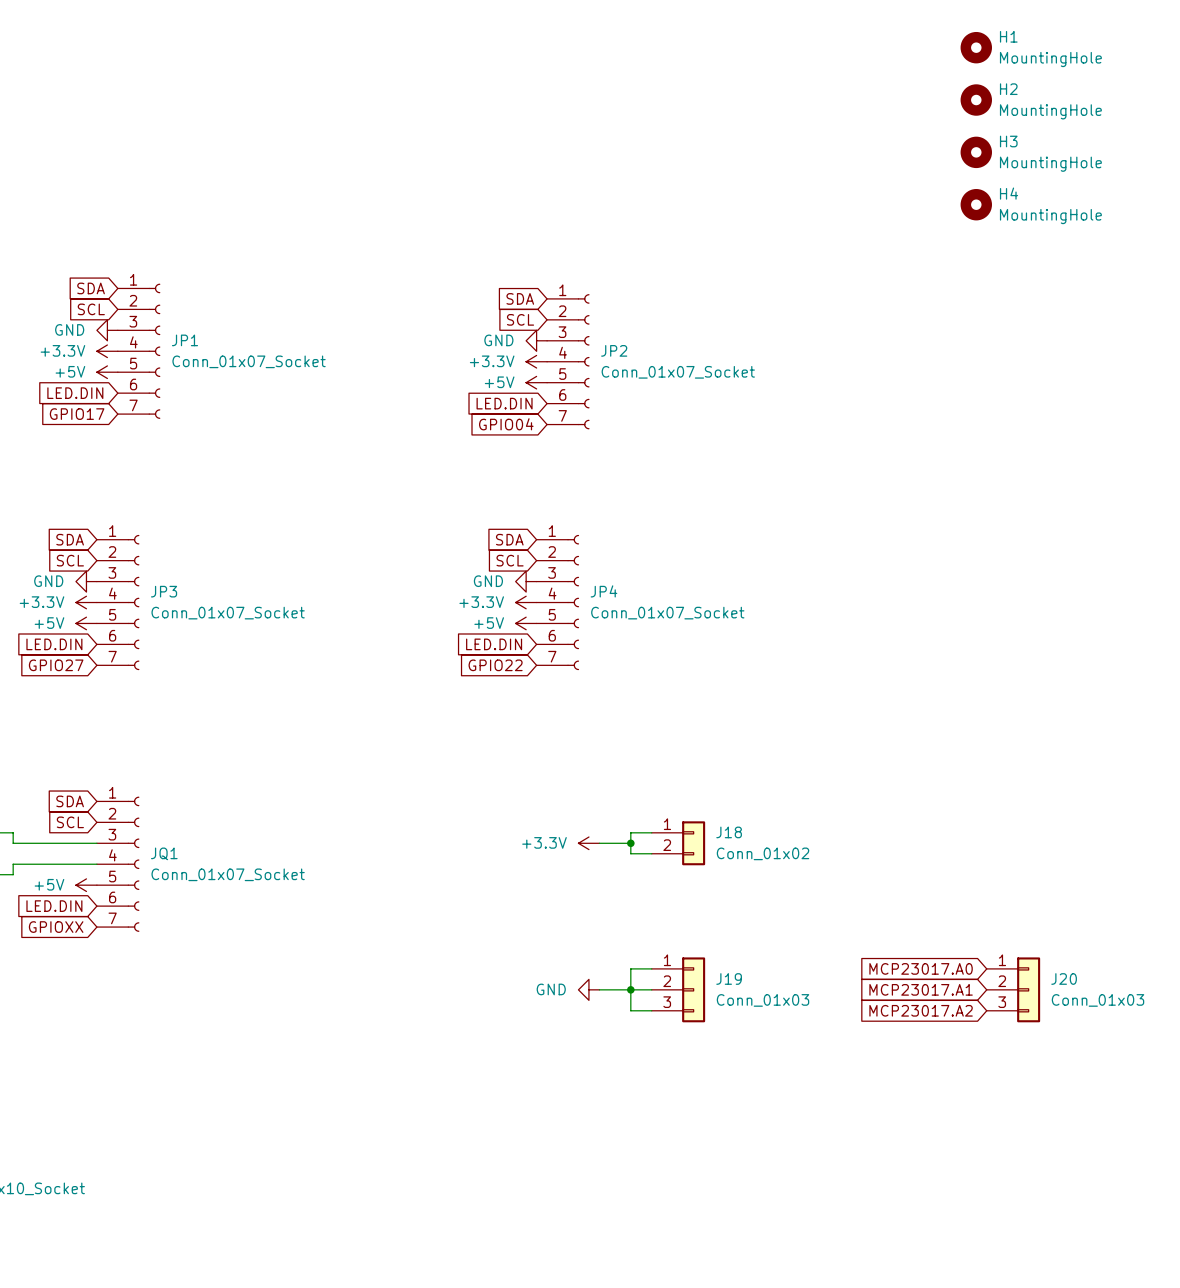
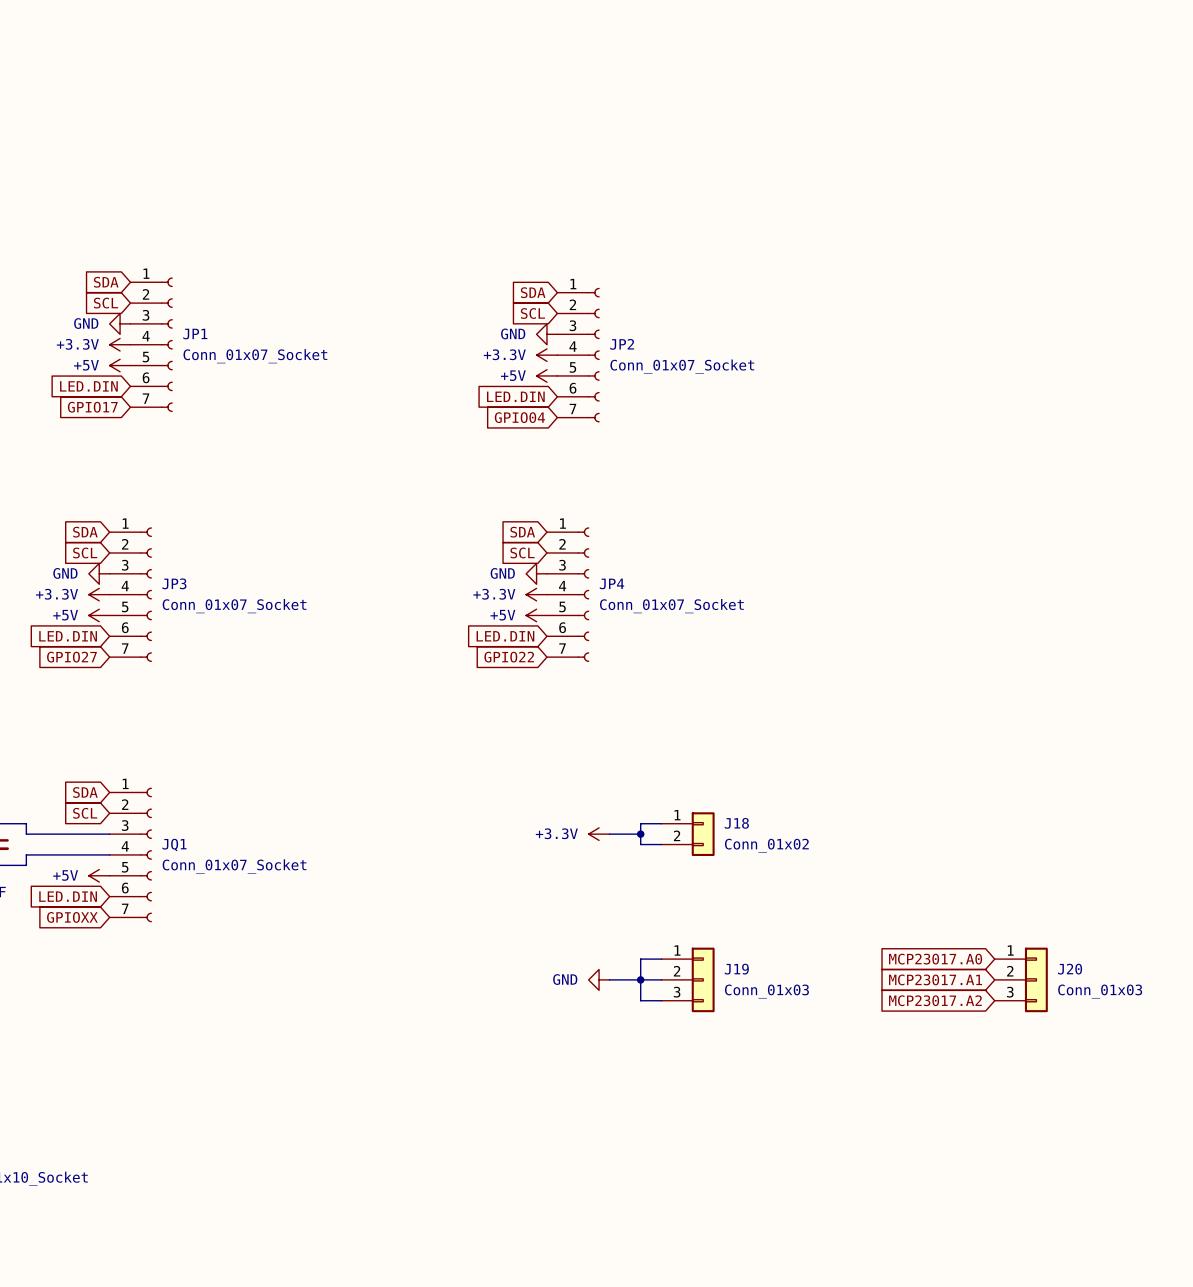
H1: MountingHole (976, 47) -> none
H2: MountingHole (976, 100) -> none
H3: MountingHole (976, 152) -> none
H4: MountingHole (976, 204) -> none

